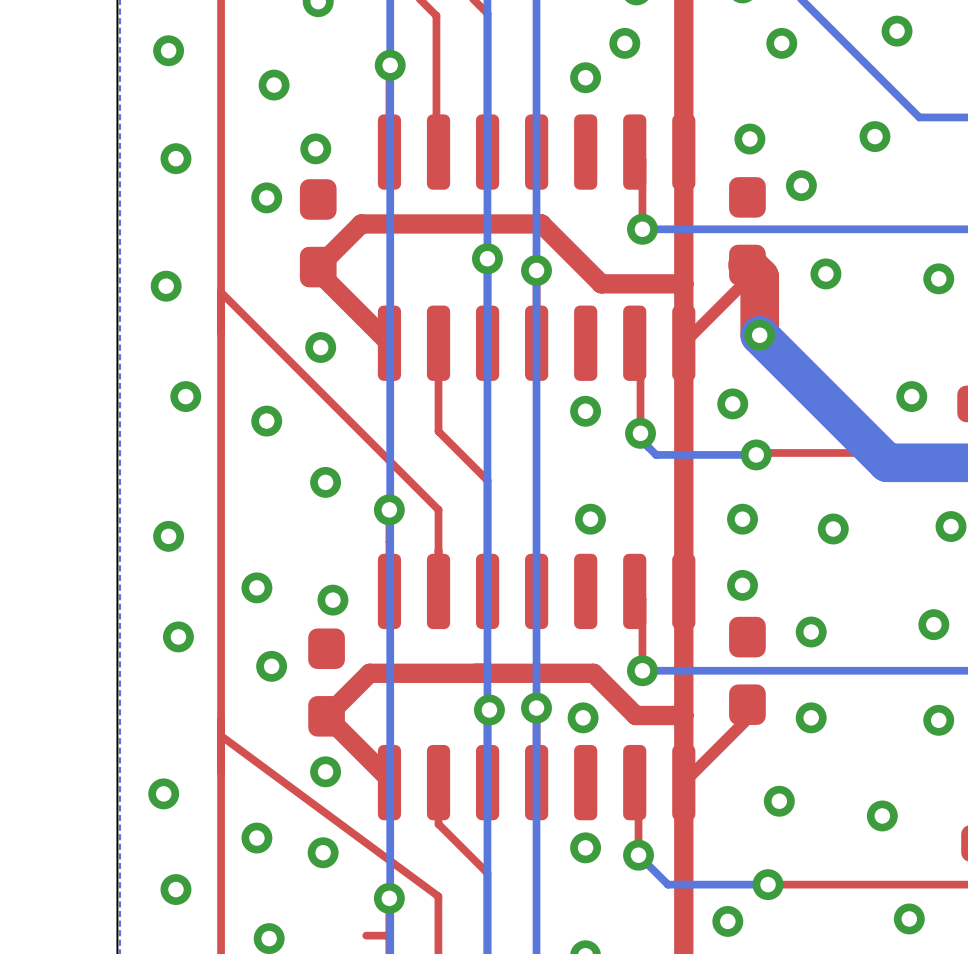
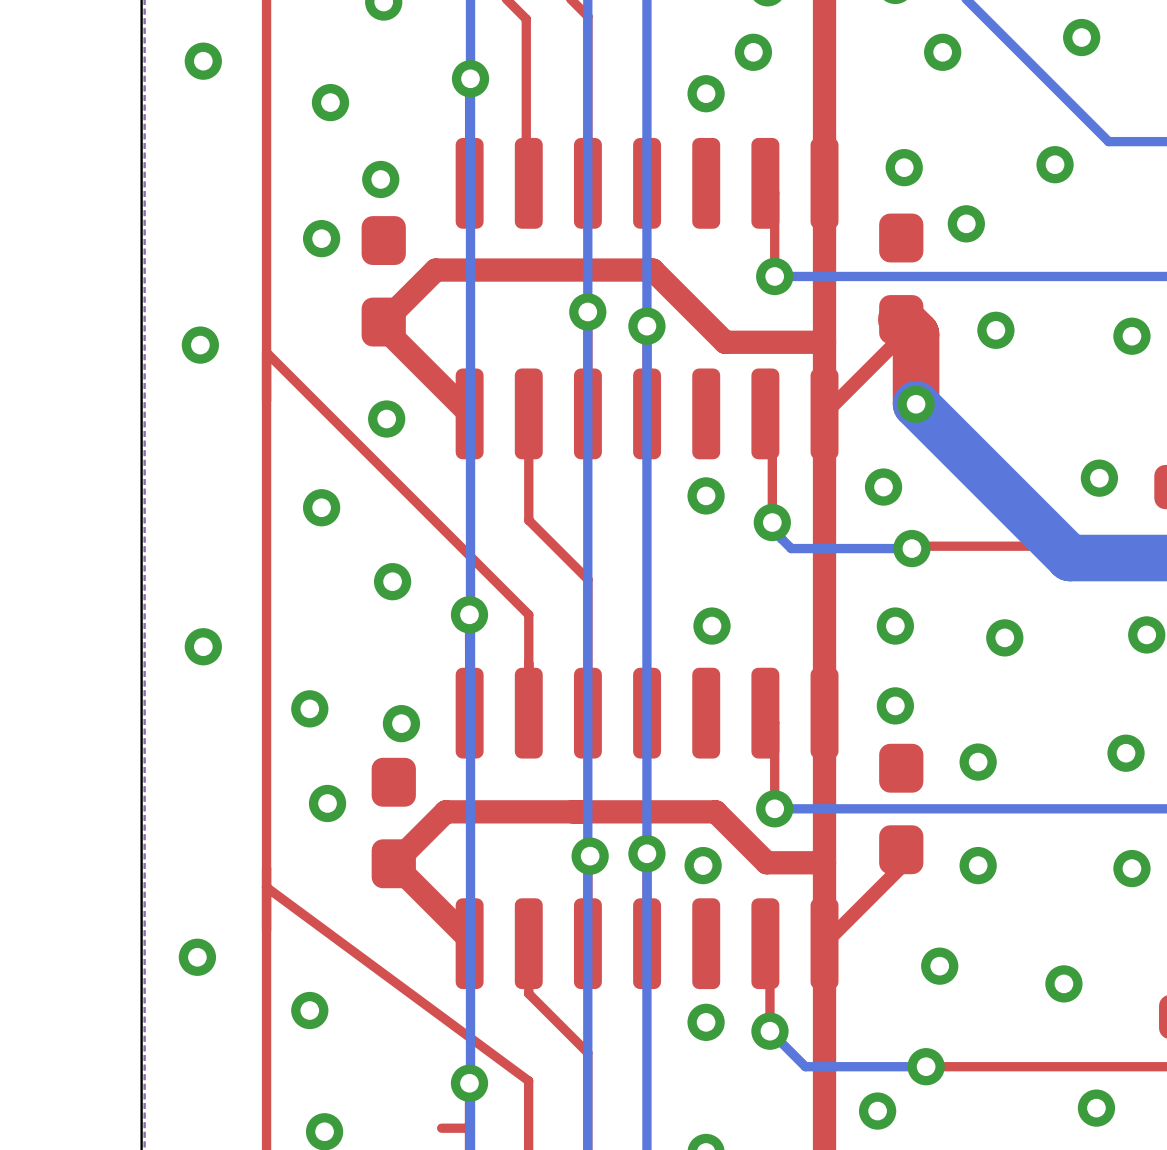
via: (175, 158) -> none
via: (185, 396) -> none
via: (178, 636) -> none
via: (325, 771) -> none
via: (323, 852) -> none
via: (175, 889) -> none

